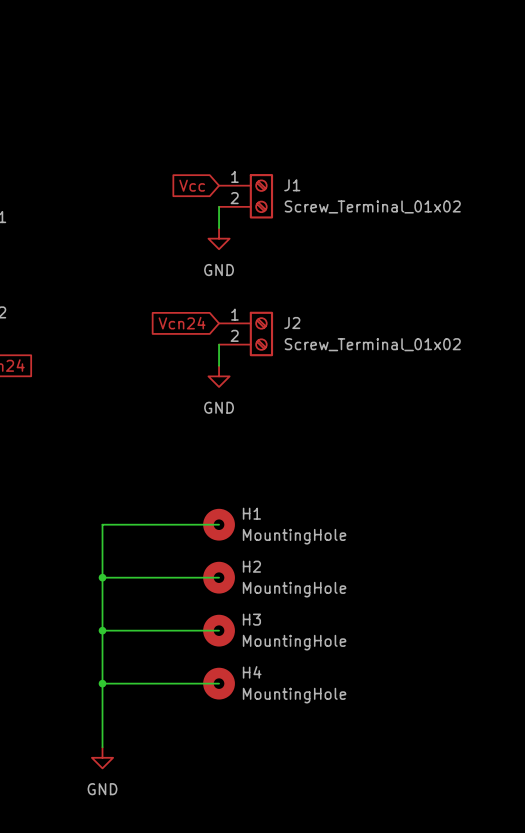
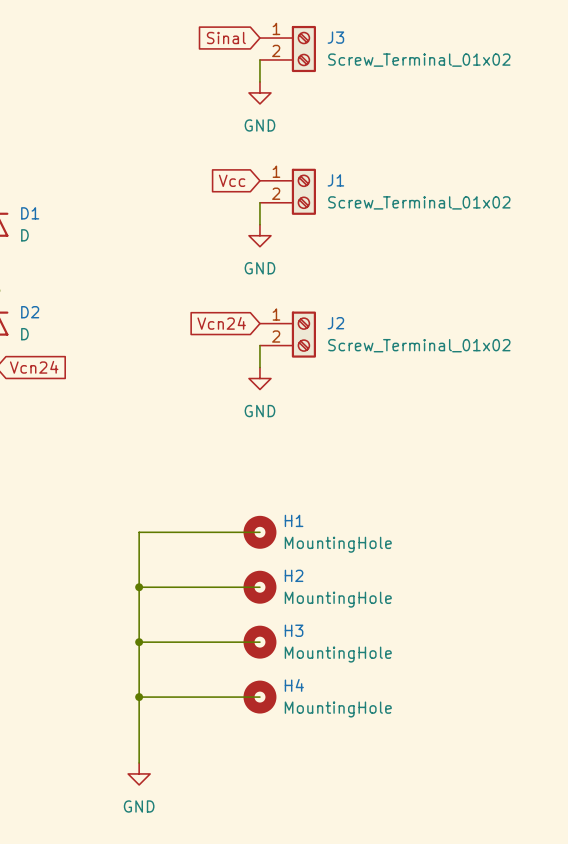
global label: none -> Sinal (226, 38)
J3: none -> Screw_Terminal_01x02 (287, 49)
wire: none -> (259, 59) (259, 81)
power symbol: none -> GND (259, 92)

